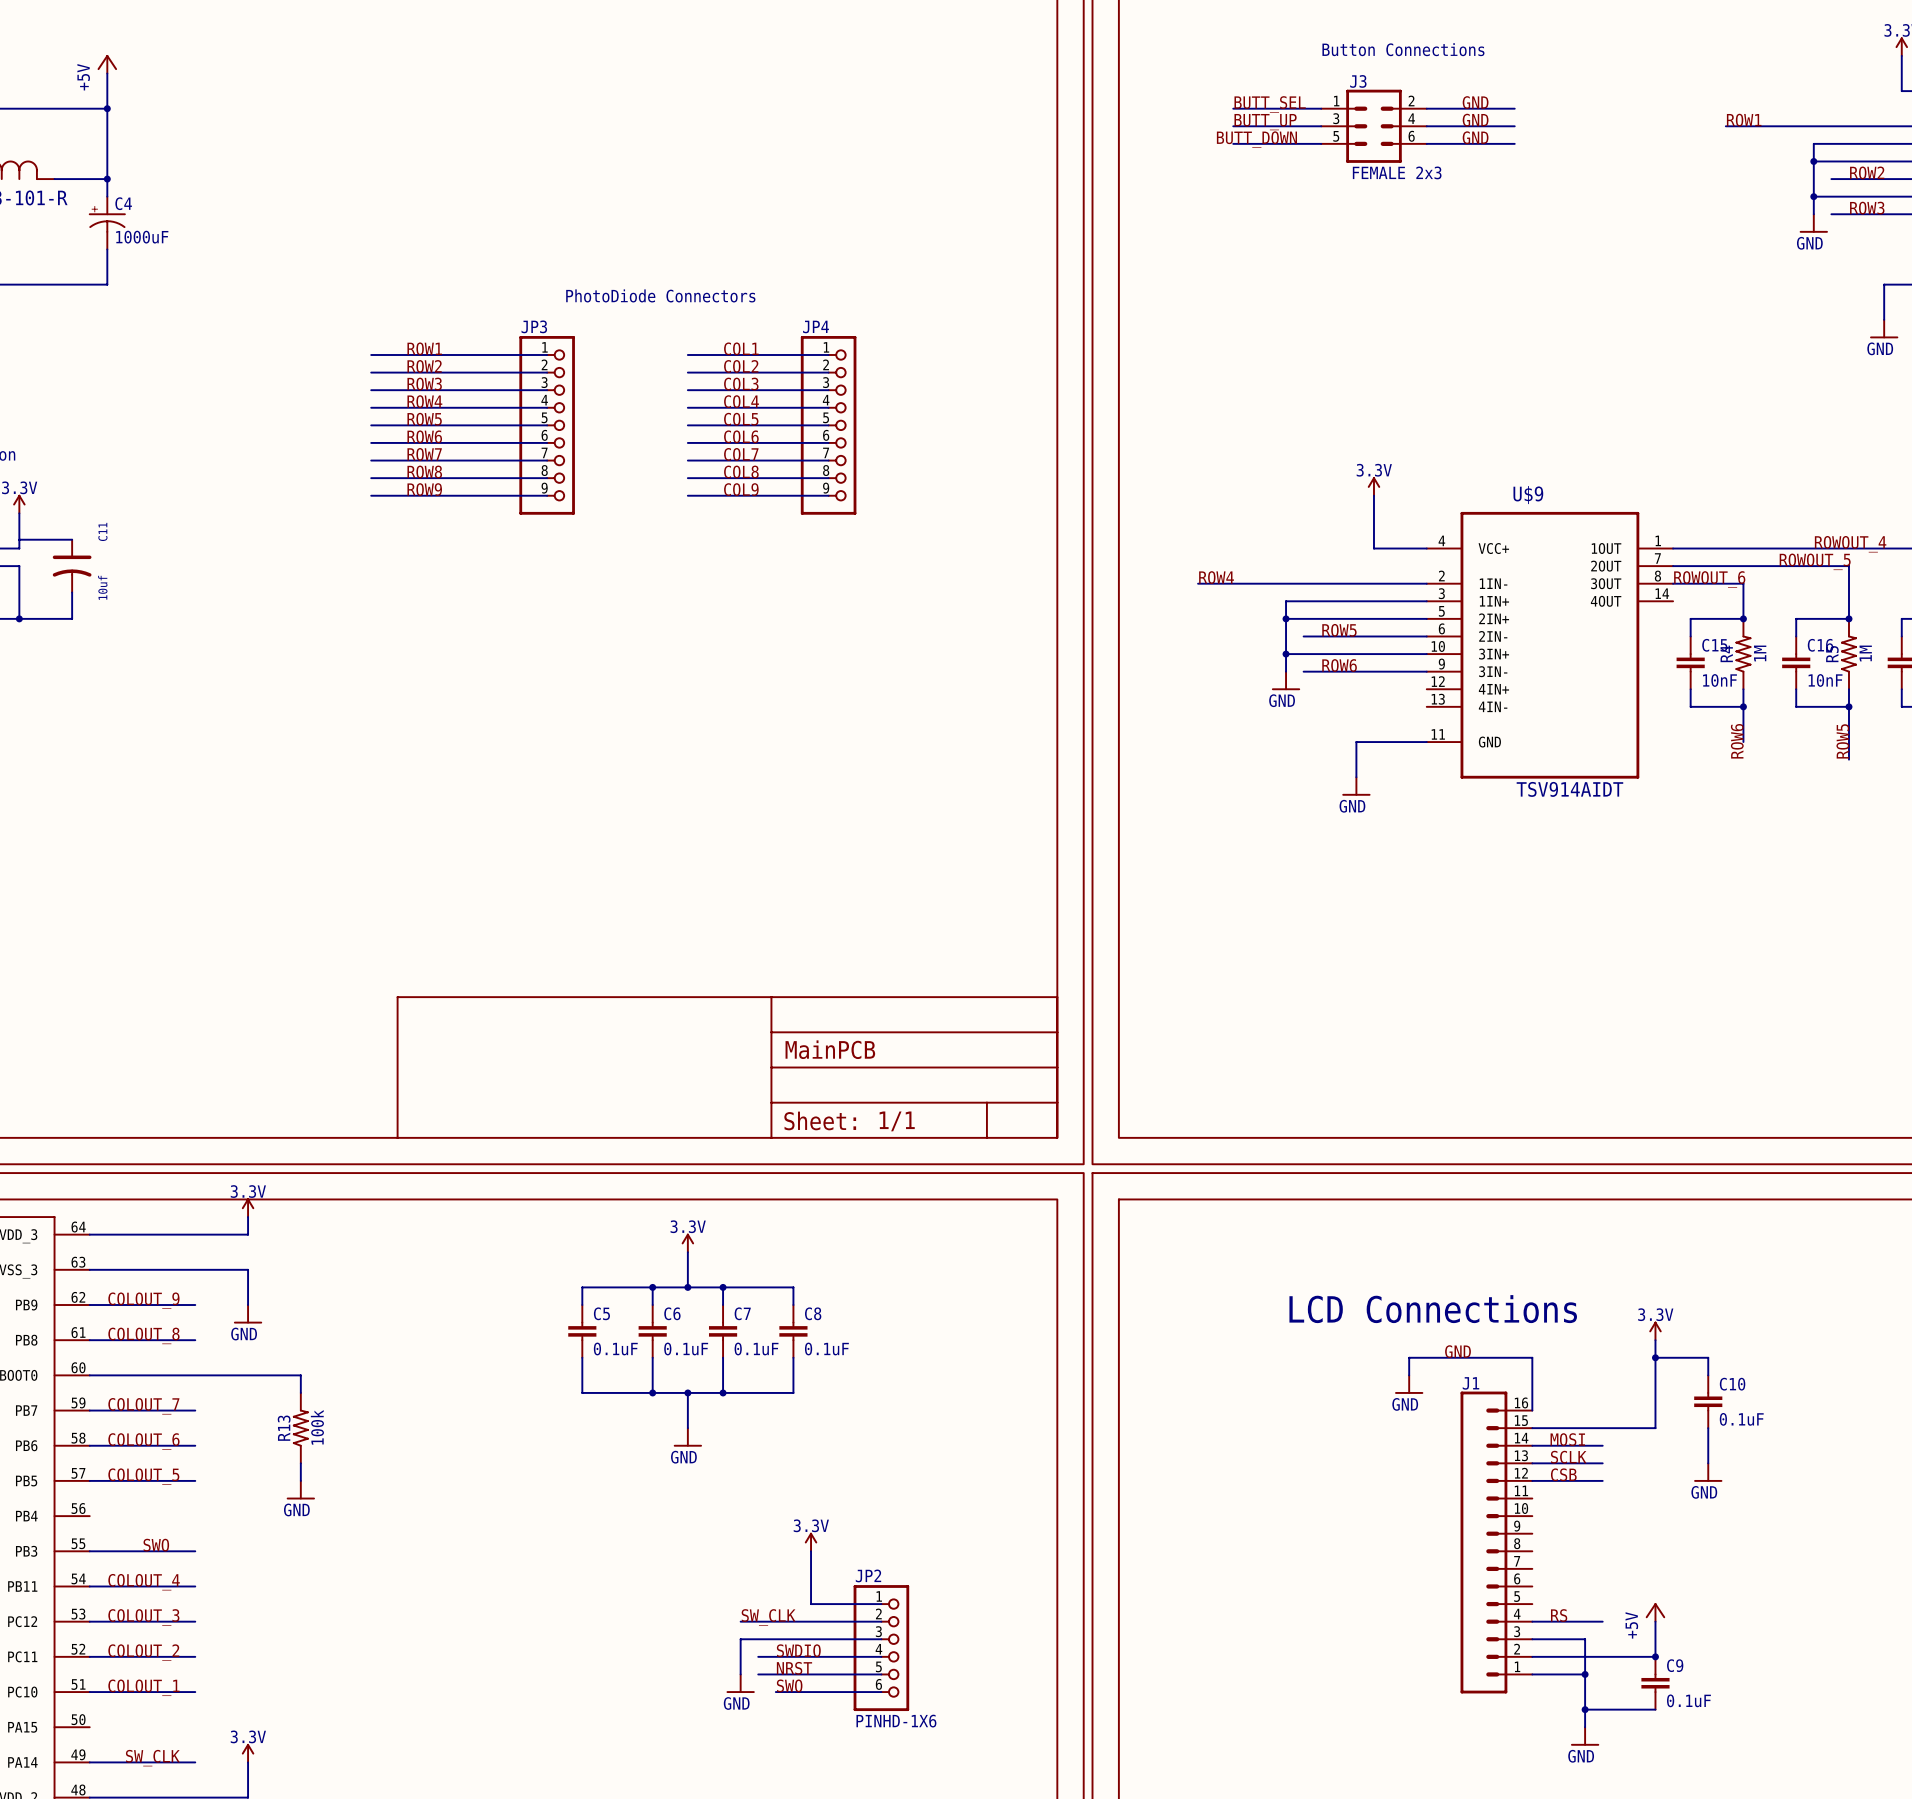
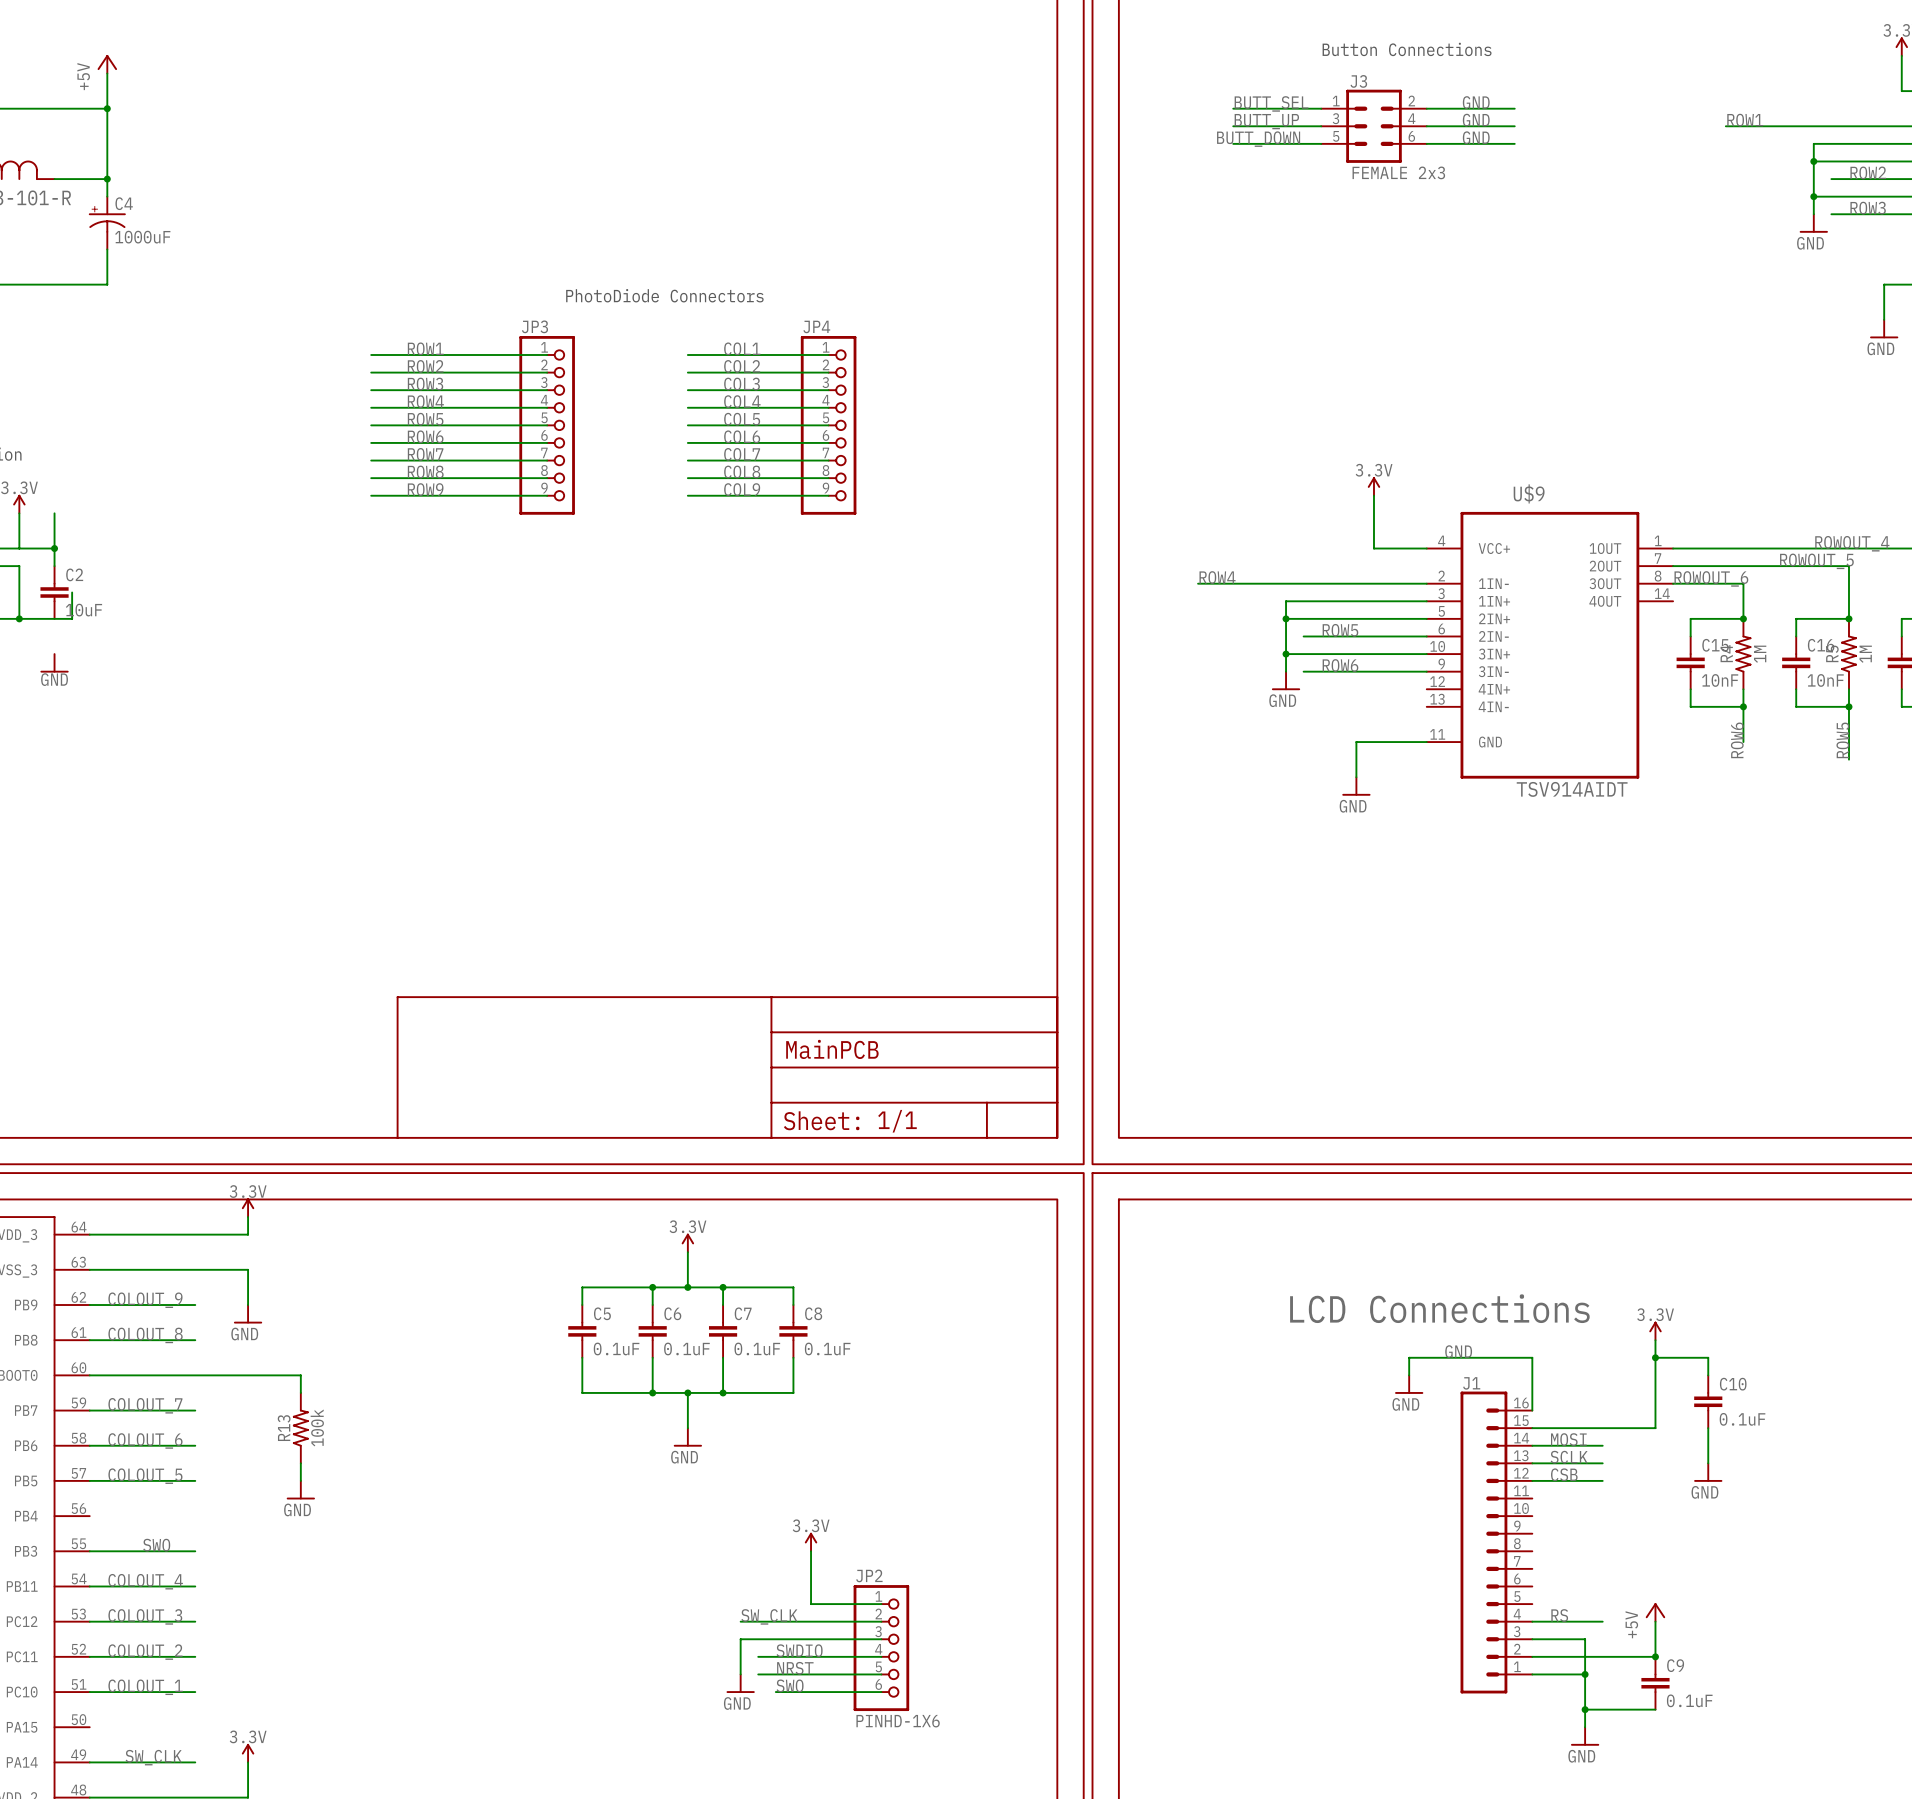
wire: none -> (54, 513) (54, 566)
wire: (19, 539) (72, 539) -> none
wire: none -> (19, 548) (54, 548)
junction: none -> (54, 548)
C11: 10uf (72, 566) -> none
C2: none -> 10uF (54, 592)
power symbol: none -> GND (54, 663)

